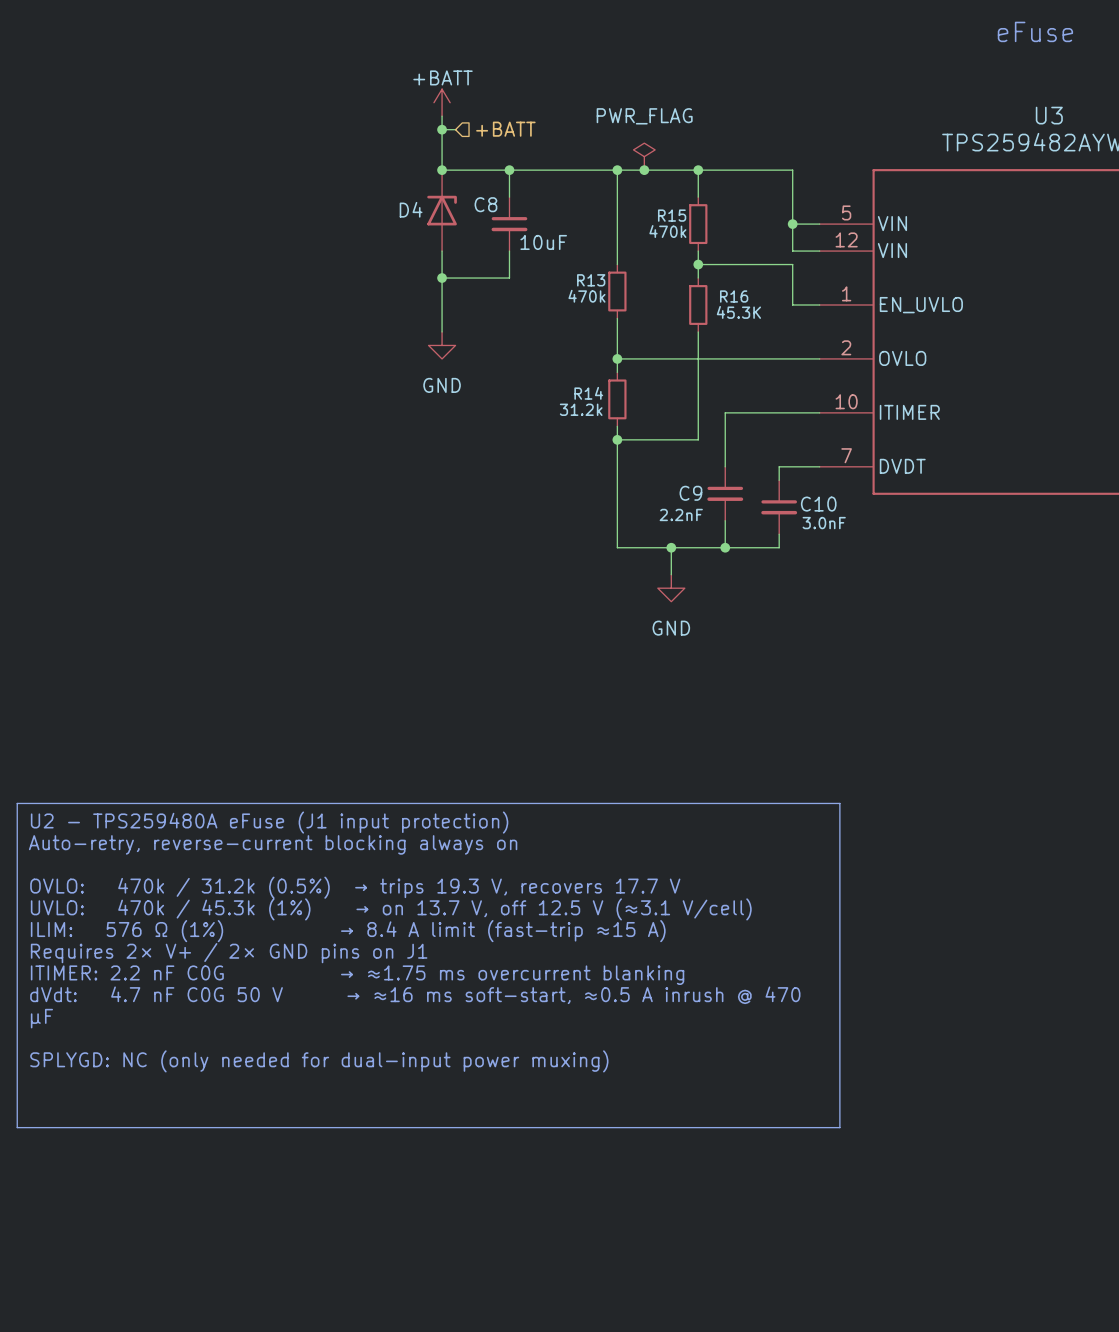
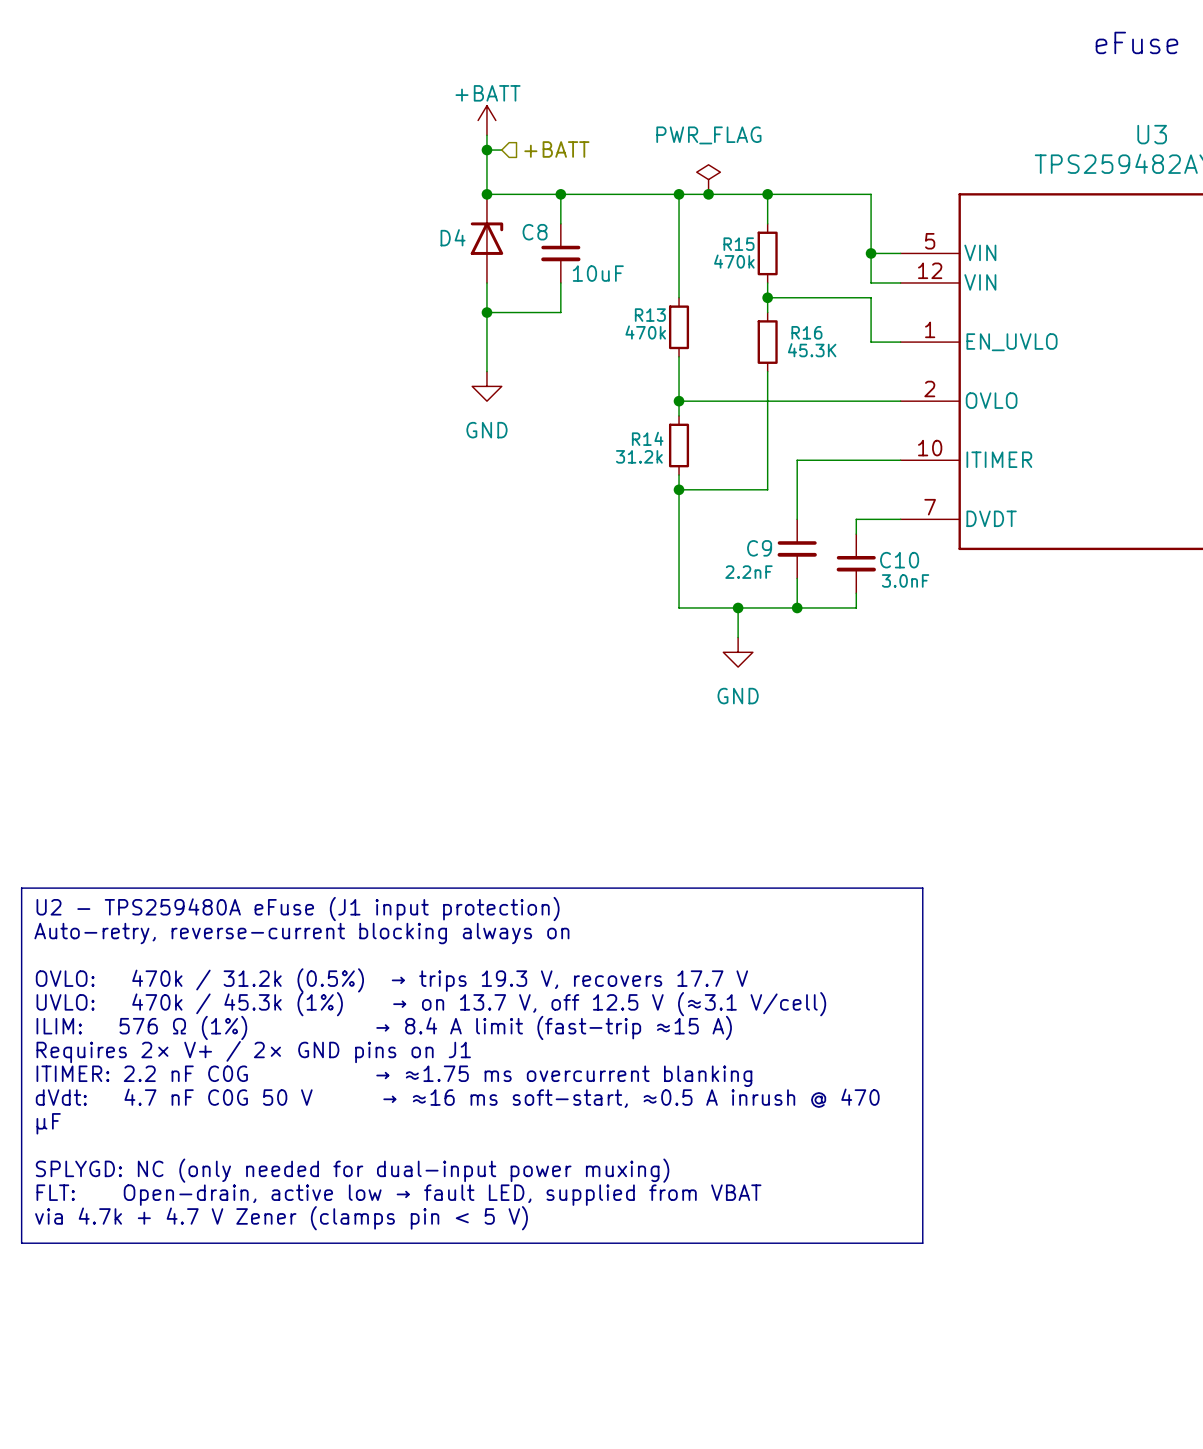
text: none -> FLT: Open-drain, active low → fault LED, supplied from VBAT (398, 1195)
text: none -> via 4.7k + 4.7 V Zener (clamps pin < 5 V) (281, 1218)

